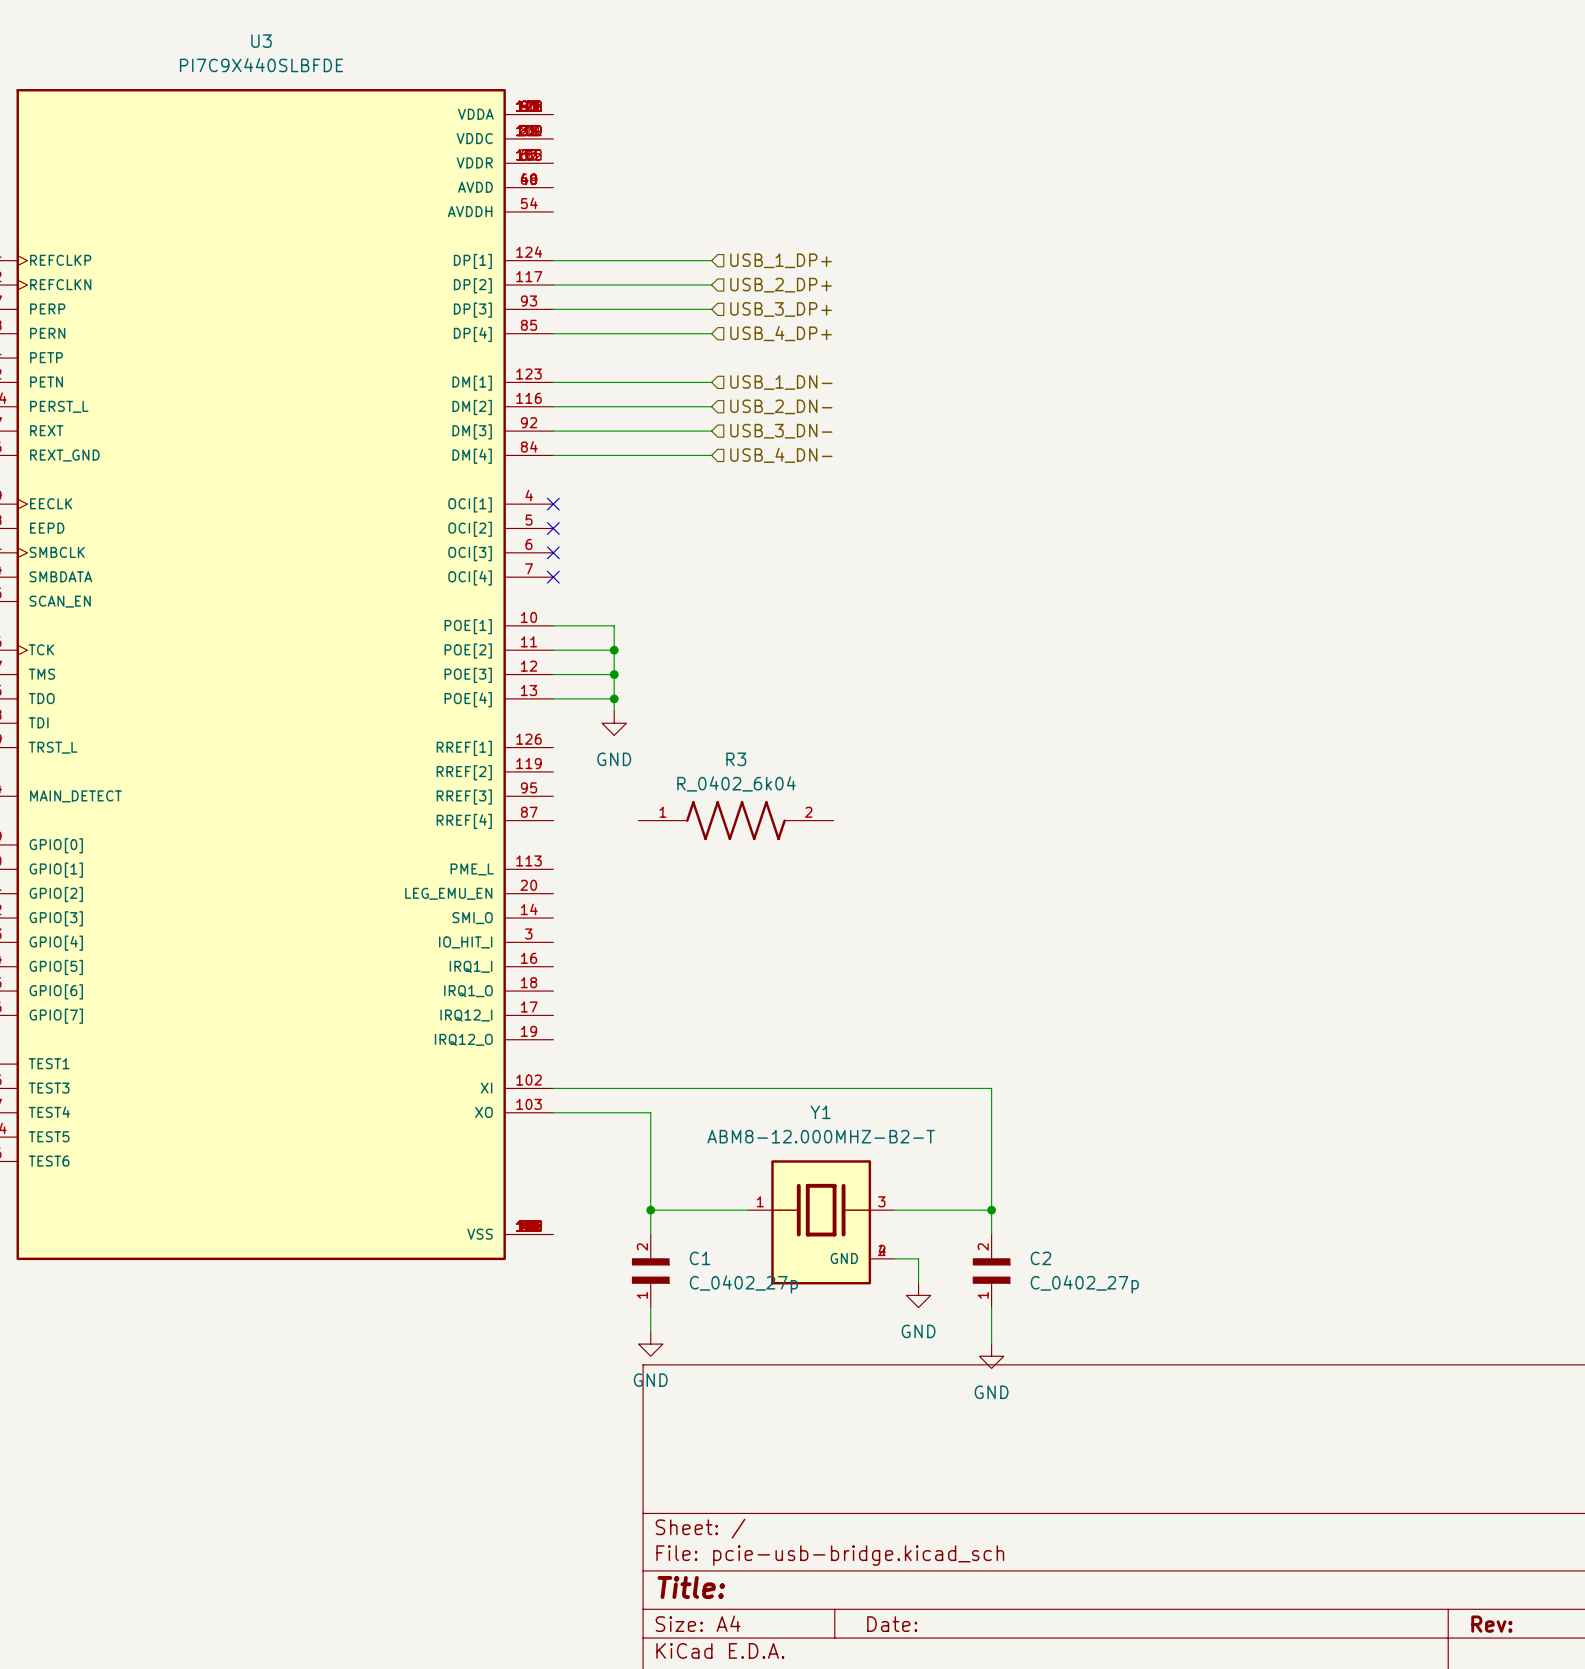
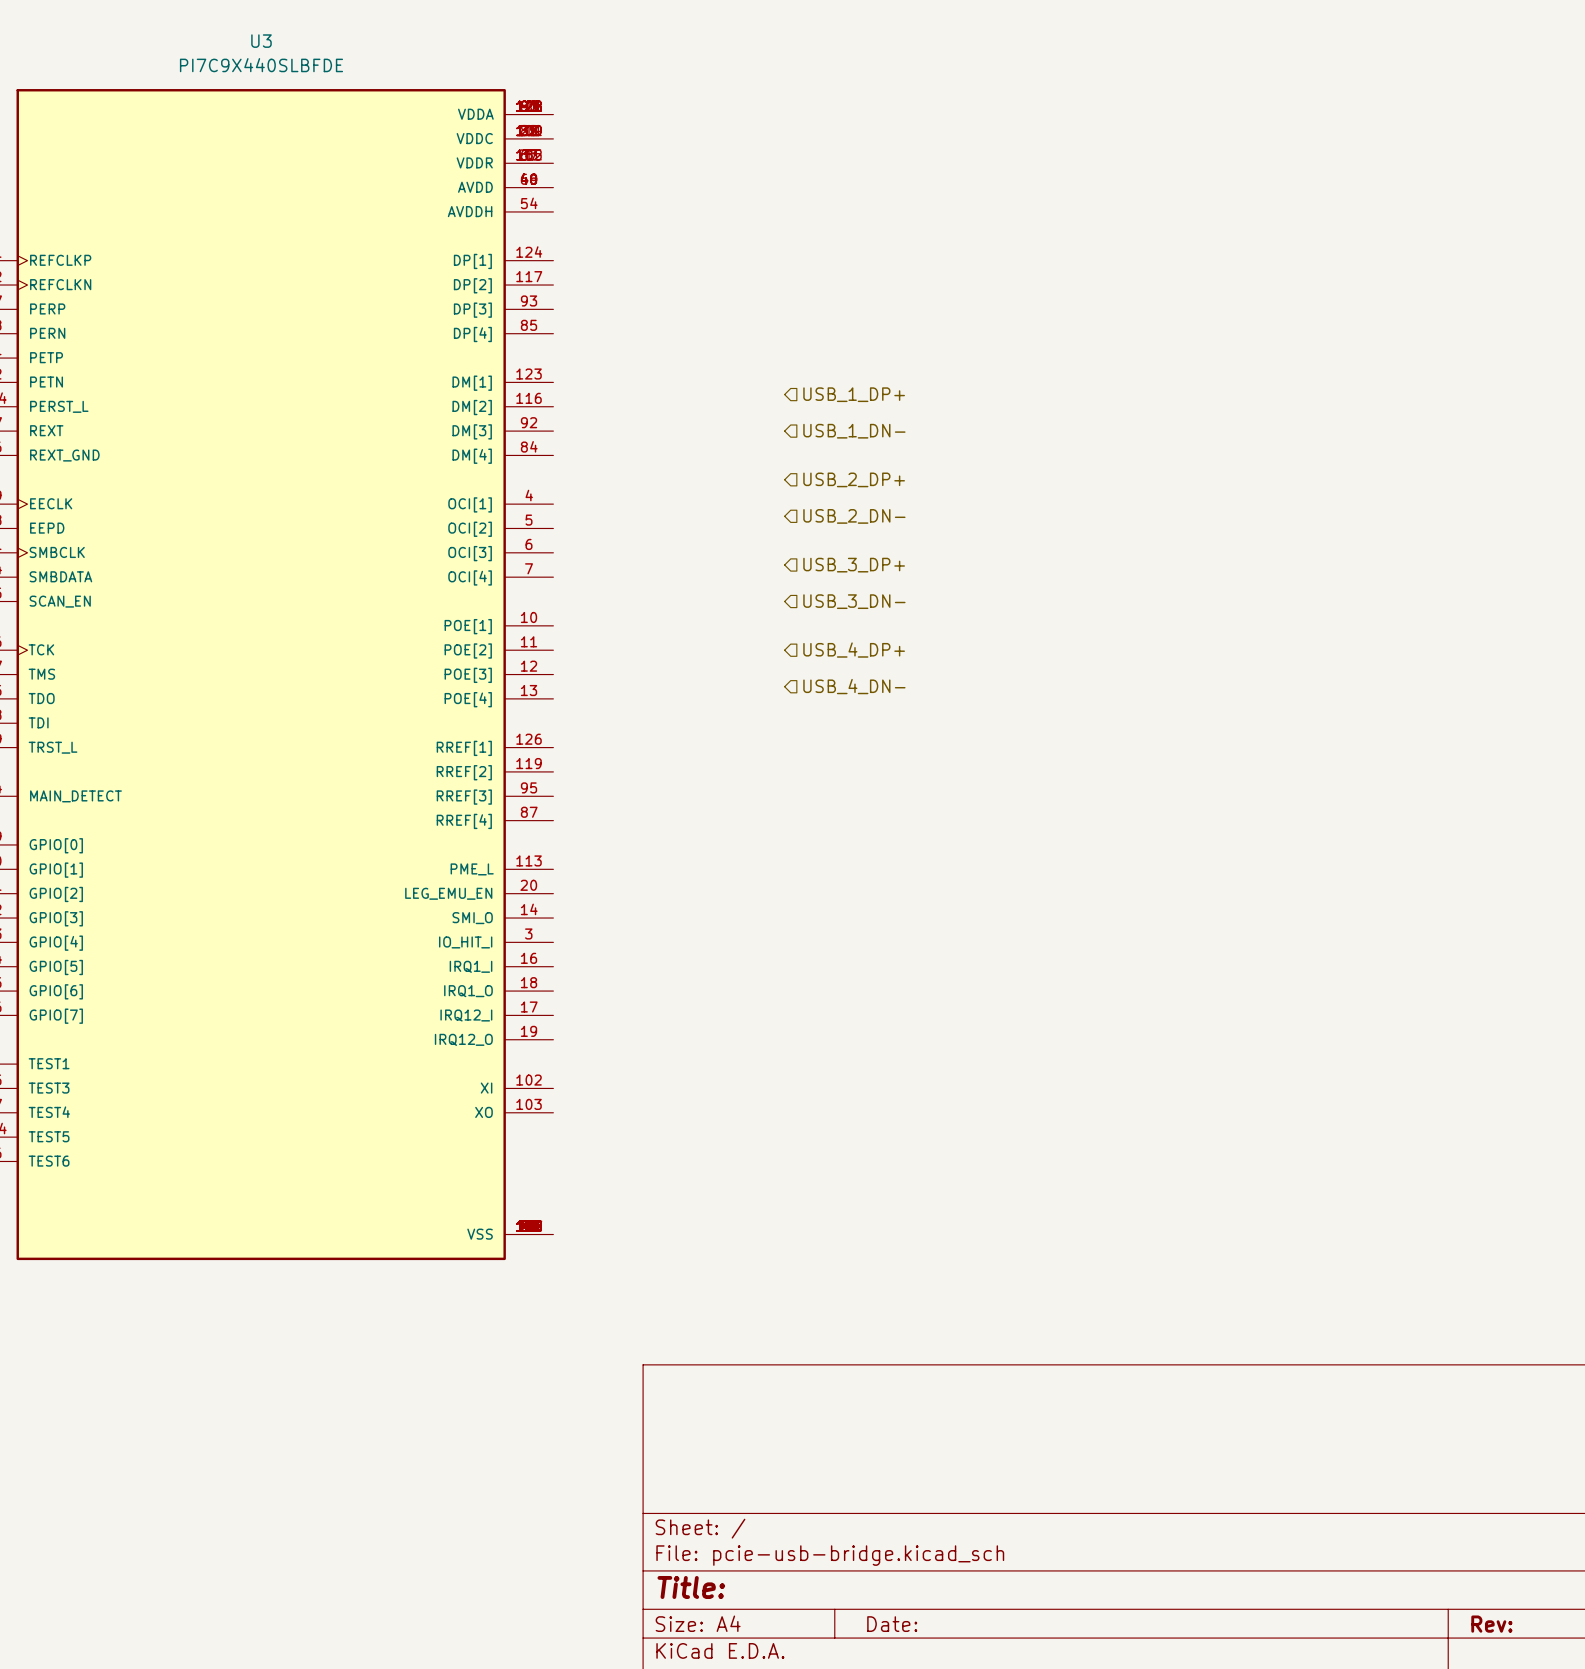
wire: (553, 260) (711, 260) -> none
hierarchical label position: USB_1_DP+ (781, 260) -> USB_1_DP+ (854, 394)
wire: (553, 285) (711, 285) -> none
hierarchical label position: USB_2_DP+ (781, 285) -> USB_2_DP+ (854, 479)
wire: (553, 309) (711, 309) -> none
hierarchical label: USB_3_DP+ (781, 309) -> none
wire: (553, 333) (711, 333) -> none
hierarchical label: USB_4_DP+ (781, 333) -> none
wire: (553, 382) (711, 382) -> none
hierarchical label position: USB_1_DN- (781, 382) -> USB_1_DN- (854, 431)
wire: (553, 406) (711, 406) -> none
hierarchical label position: USB_2_DN- (781, 406) -> USB_2_DN- (854, 516)
wire: (553, 431) (711, 431) -> none
hierarchical label position: USB_3_DN- (781, 431) -> USB_3_DN- (854, 601)
wire: (553, 455) (711, 455) -> none
hierarchical label: USB_4_DN- (781, 455) -> none
no-connect mark: (553, 504) -> none
no-connect mark: (553, 528) -> none
no-connect mark: (553, 552) -> none
hierarchical label: none -> USB_3_DP+ (854, 565)
no-connect mark: (553, 577) -> none
wire: (553, 625) (614, 625) (614, 711) -> none
wire: (553, 650) (614, 650) -> none
junction: (614, 650) -> none
hierarchical label: none -> USB_4_DP+ (854, 650)
wire: (553, 674) (614, 674) -> none
junction: (614, 674) -> none
hierarchical label: none -> USB_4_DN- (854, 686)
wire: (553, 698) (614, 698) -> none
junction: (614, 698) -> none
power symbol: GND (614, 723) -> none
R3: R_0402_6k04 (735, 820) -> none
wire: (553, 1088) (991, 1088) (991, 1234) -> none
wire: (553, 1112) (650, 1112) (650, 1234) -> none
wire: (650, 1210) (748, 1210) -> none
junction: (650, 1210) -> none
wire: (894, 1210) (991, 1210) -> none
junction: (991, 1210) -> none
Y1: ABM8-12.000MHZ-B2-T (821, 1222) -> none
wire: (894, 1258) (918, 1258) (918, 1283) -> none
C1: C_0402_27p (650, 1271) -> none
C2: C_0402_27p (991, 1271) -> none
power symbol: GND (918, 1295) -> none
wire: (650, 1307) (650, 1331) -> none
wire: (991, 1307) (991, 1344) -> none
power symbol: GND (650, 1344) -> none
power symbol: GND (991, 1356) -> none

